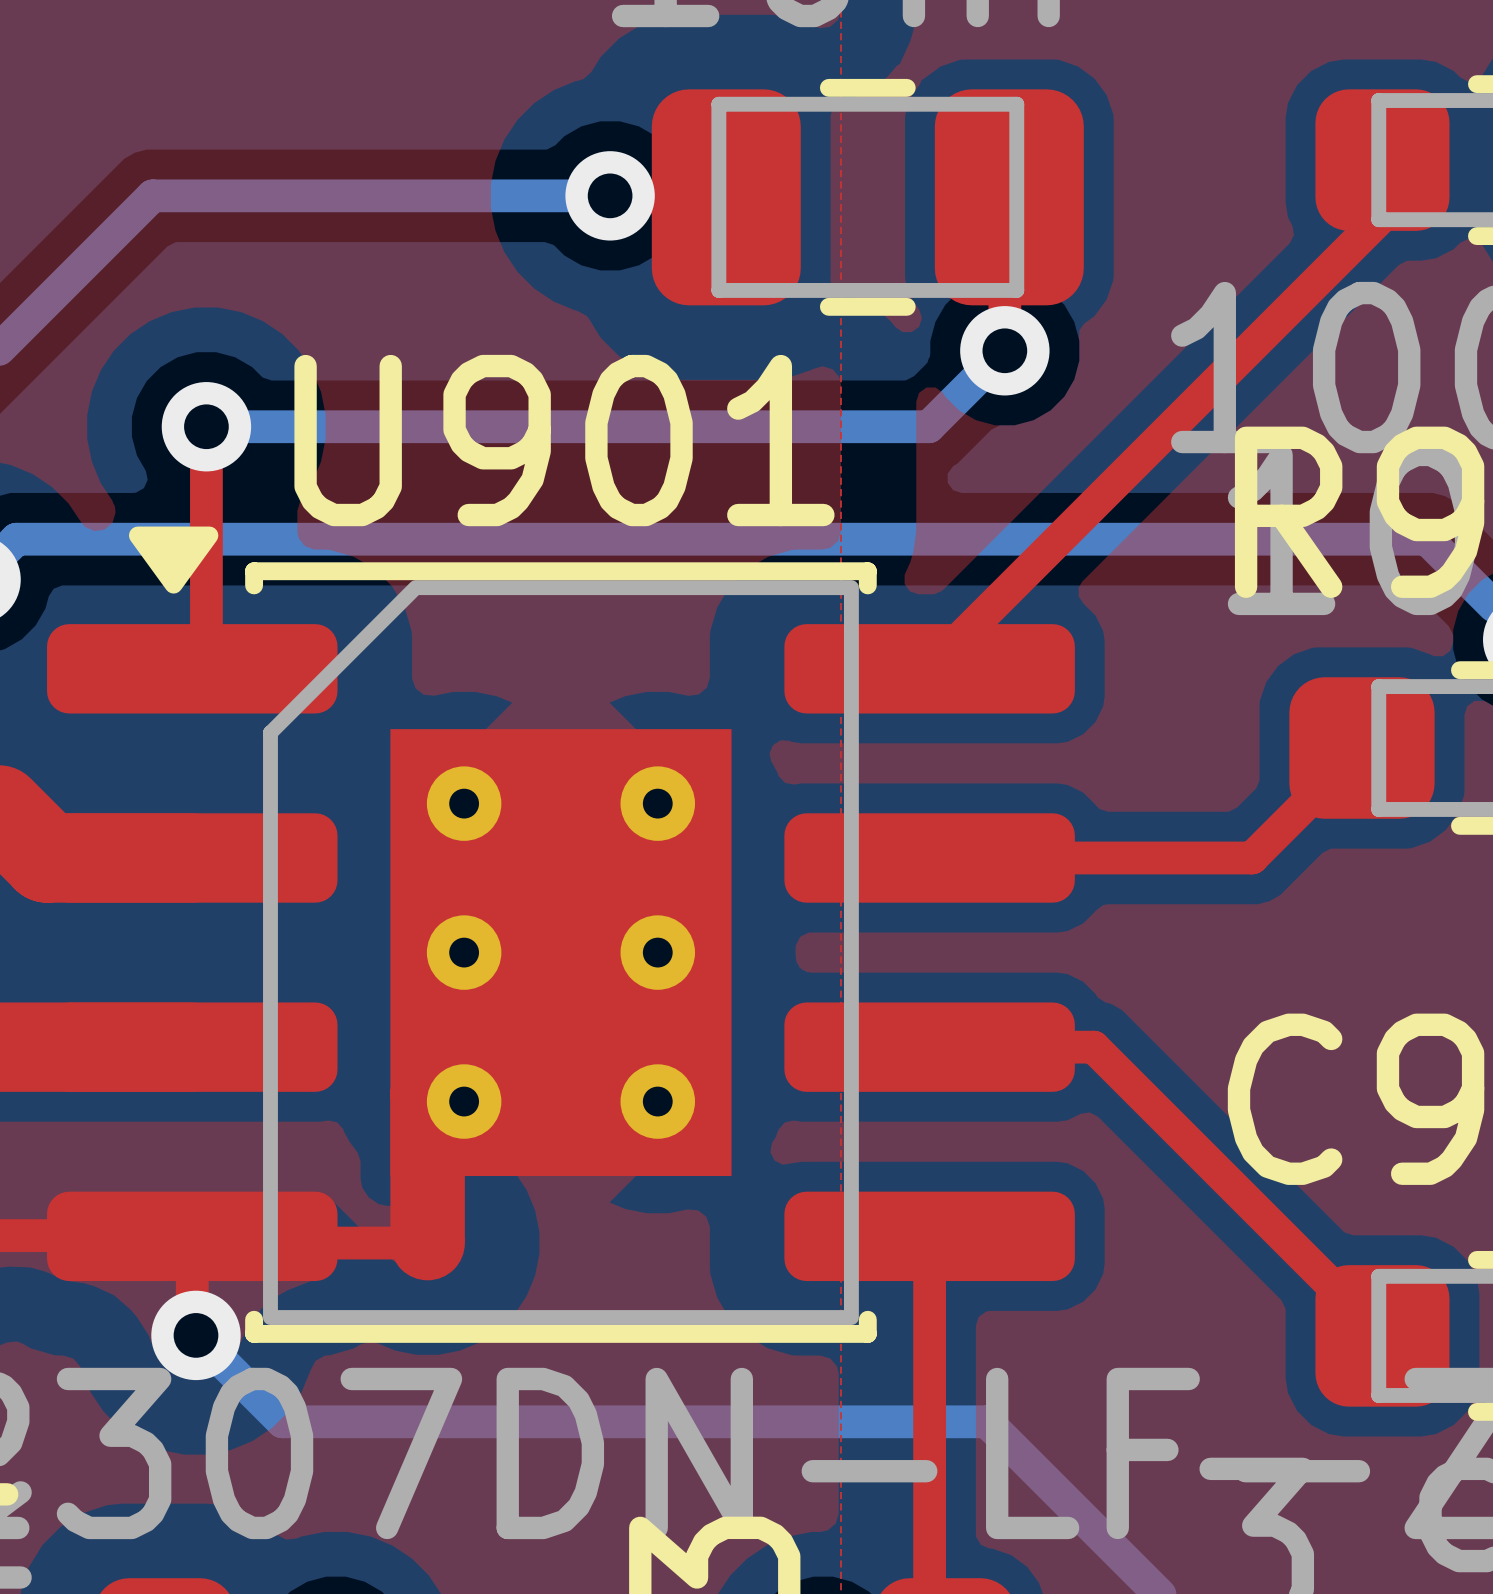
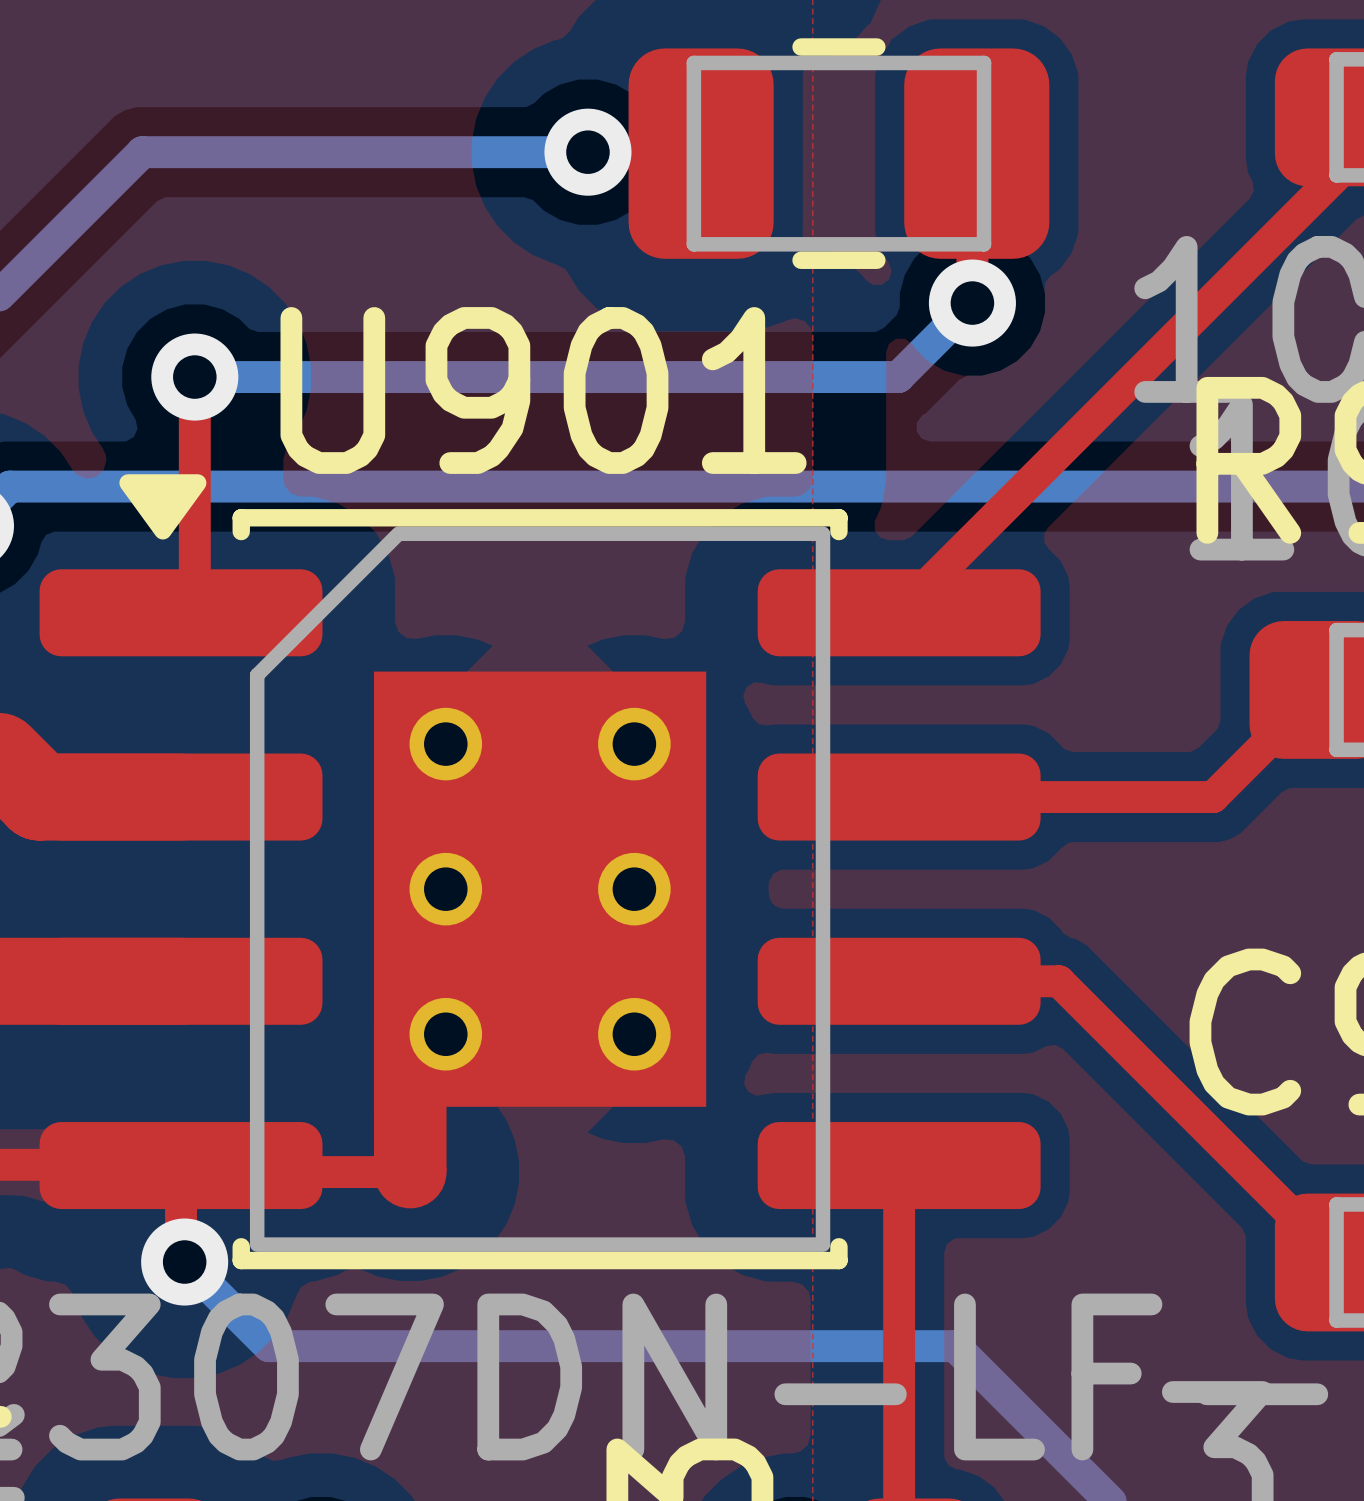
U901 footprint: [47, 526, 1075, 1343] -> [39, 474, 1041, 1270]

